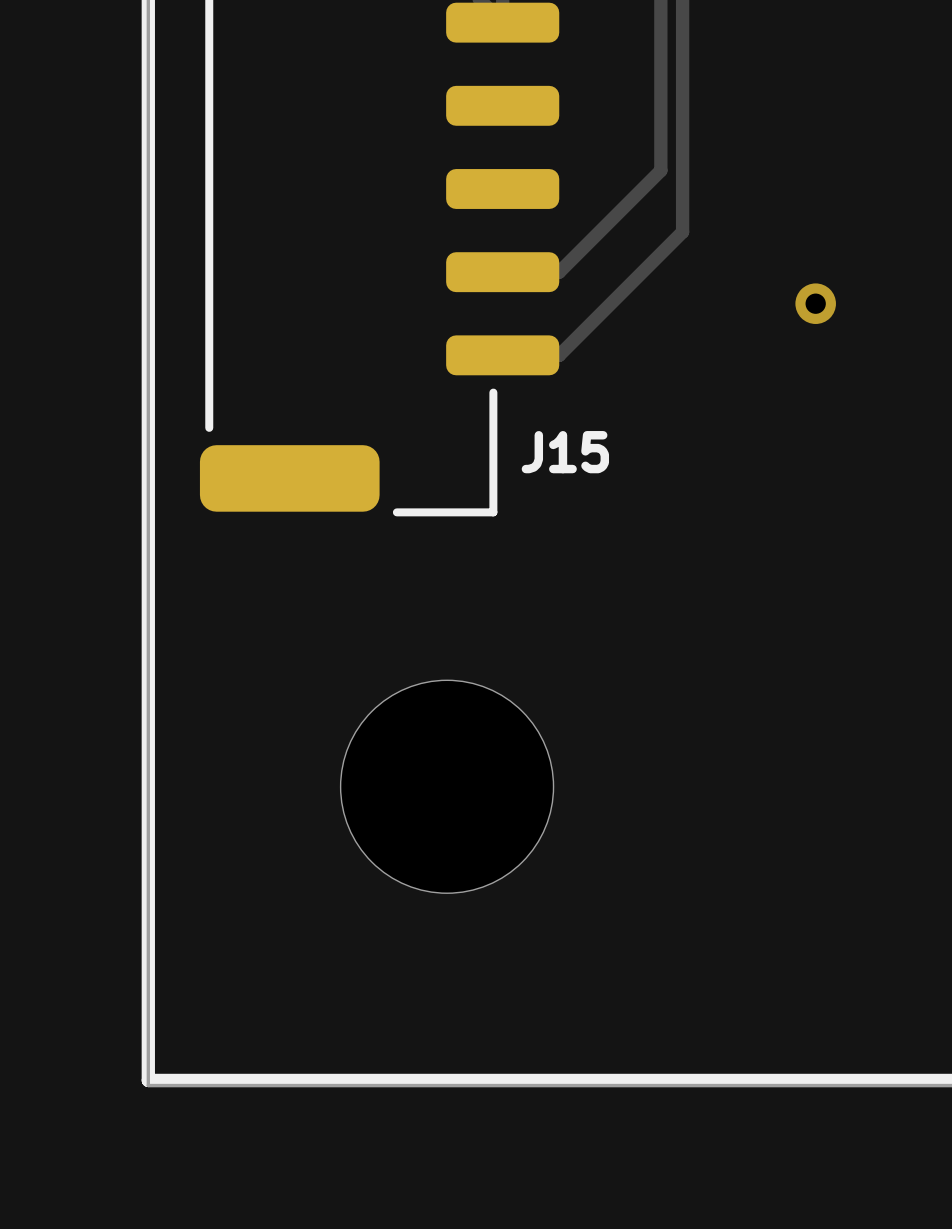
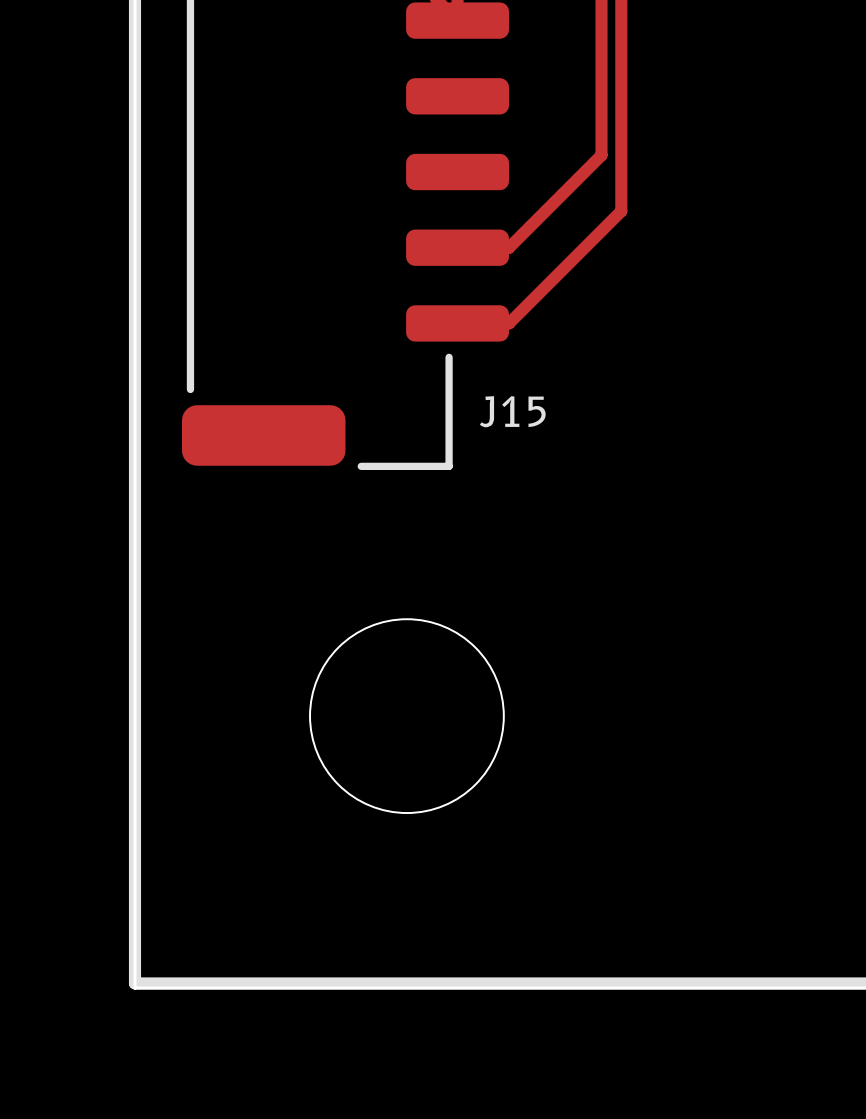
via: (815, 303) -> none

